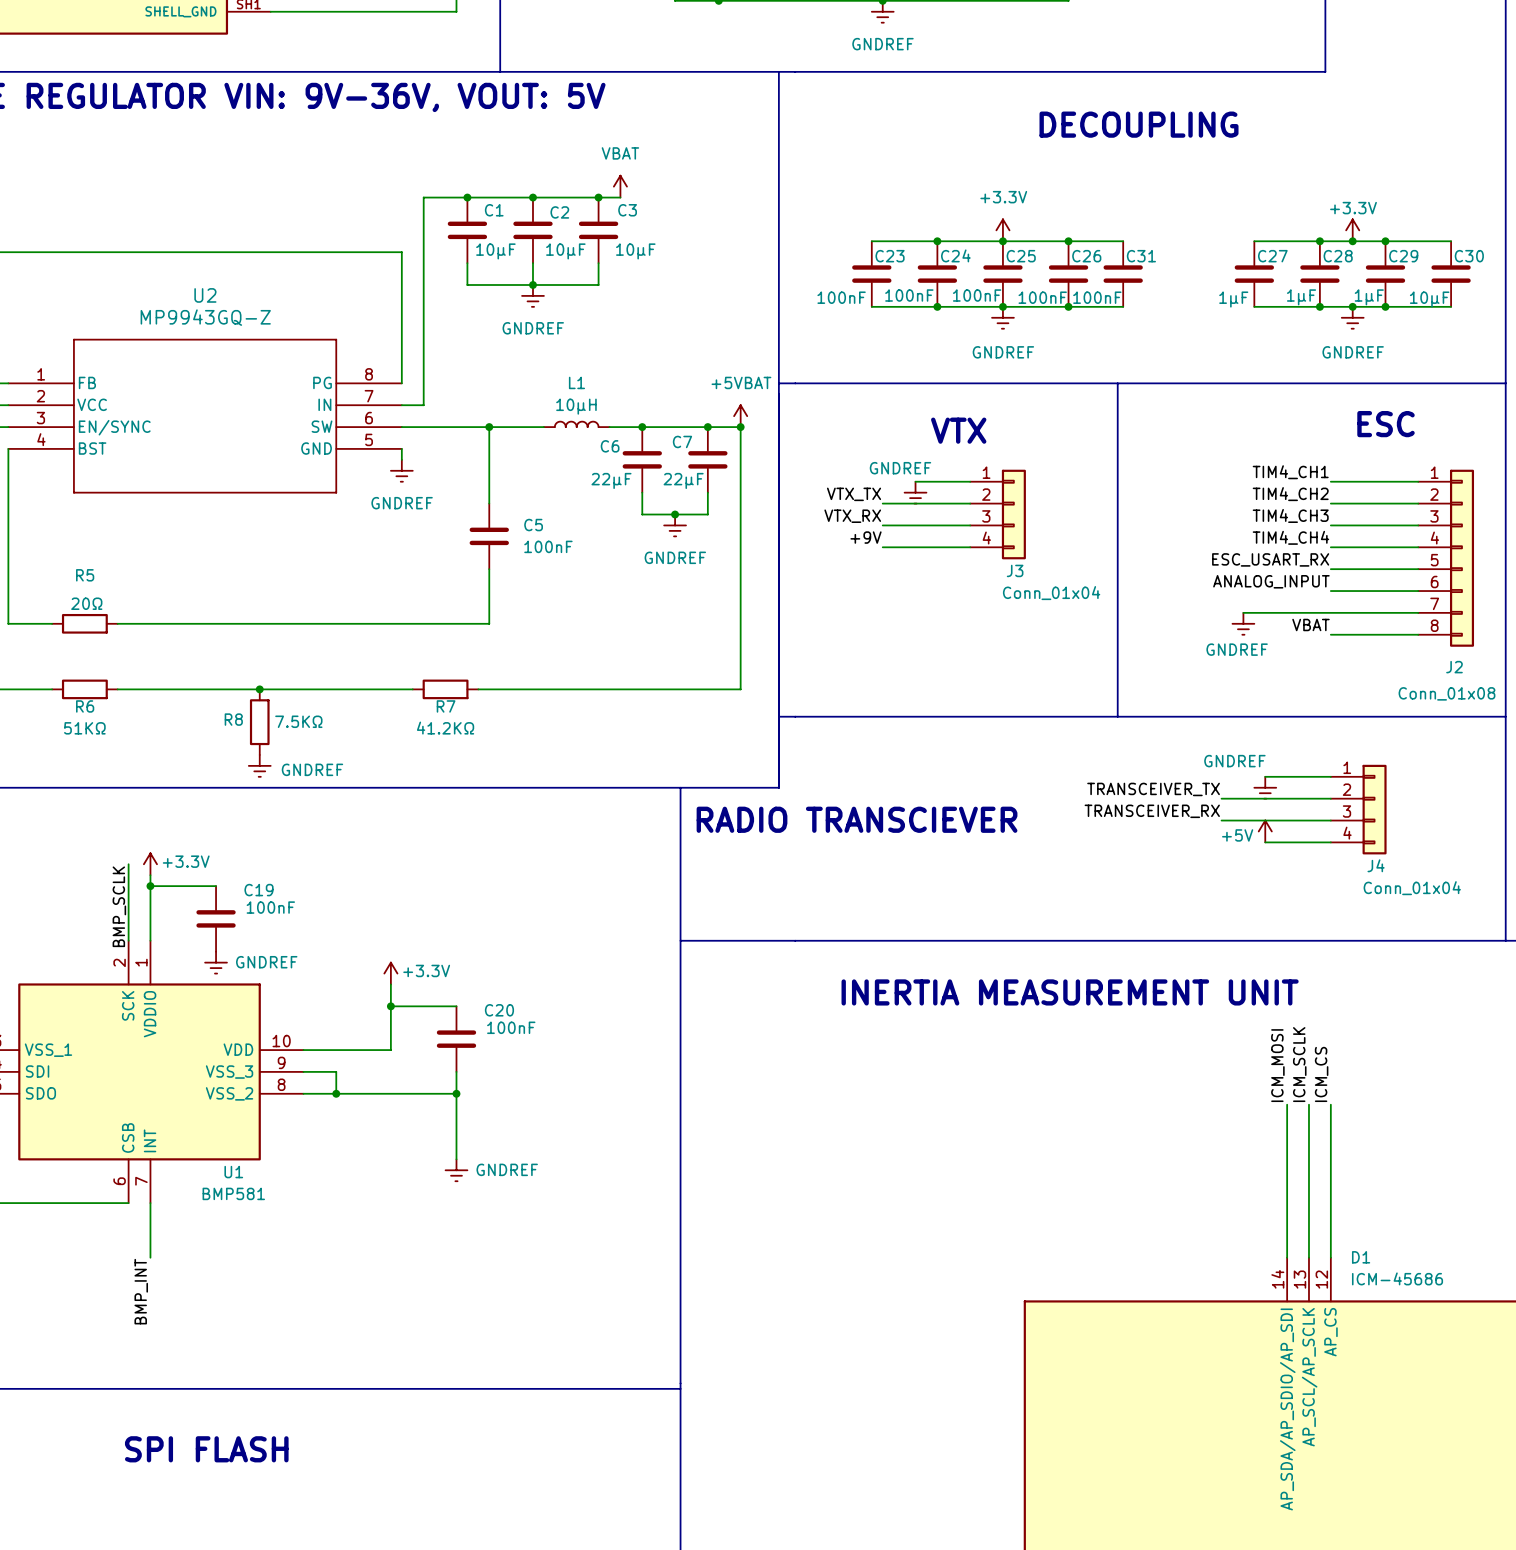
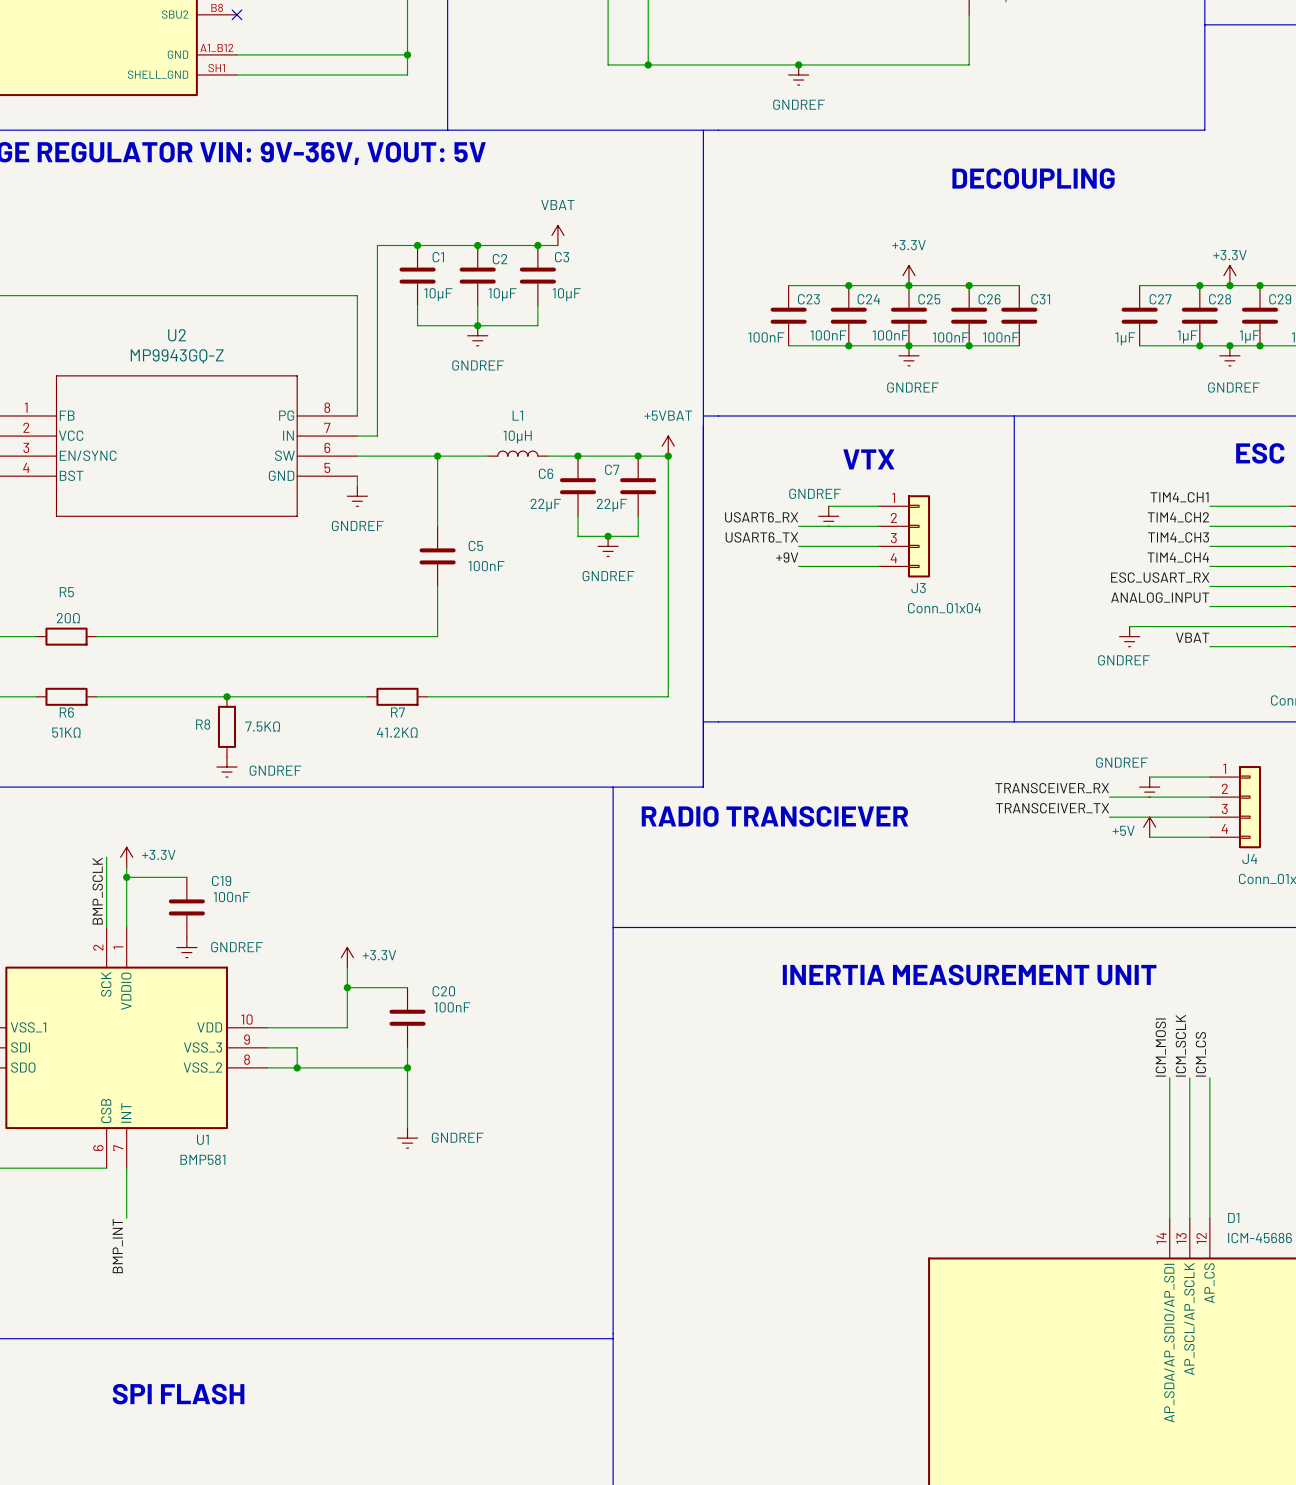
label: VTX_TX (854, 494) -> USART6_RX (761, 517)
label: VTX_RX (852, 516) -> USART6_TX (761, 537)
label: TRANSCEIVER_TX (1153, 789) -> TRANSCEIVER_RX (1052, 788)
label: TRANSCEIVER_RX (1152, 811) -> TRANSCEIVER_TX (1052, 808)

